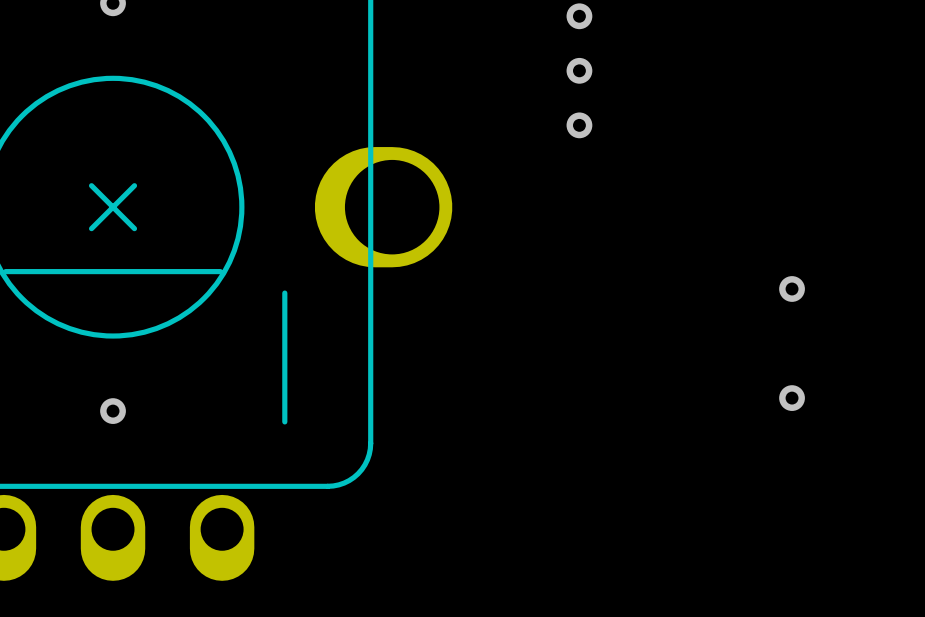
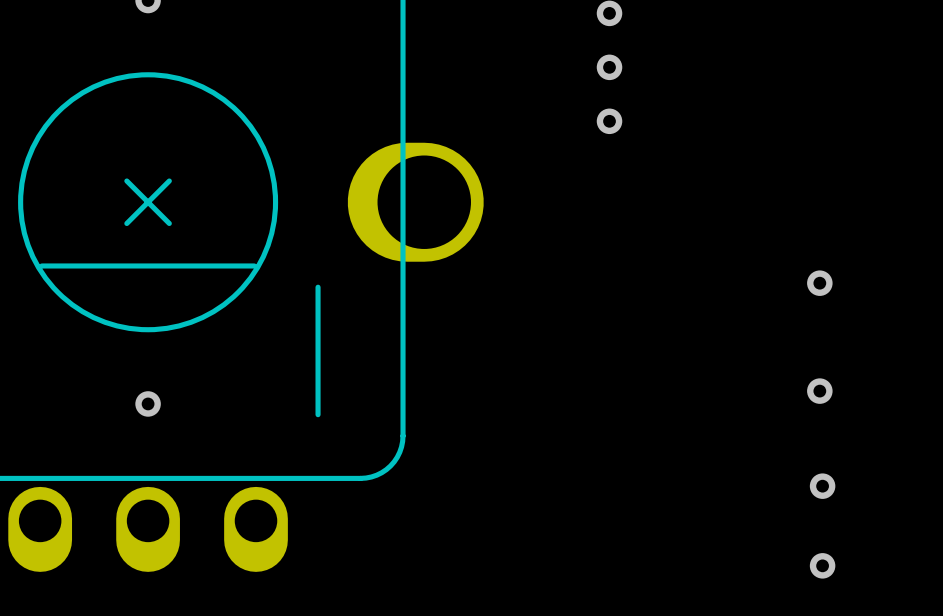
via: none -> (822, 486)
via: none -> (822, 565)

